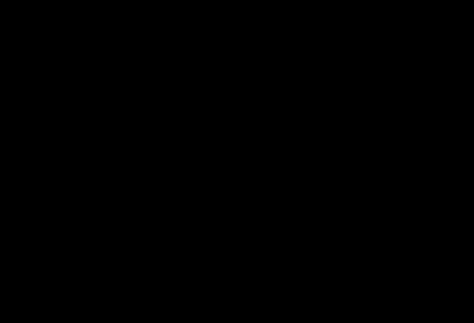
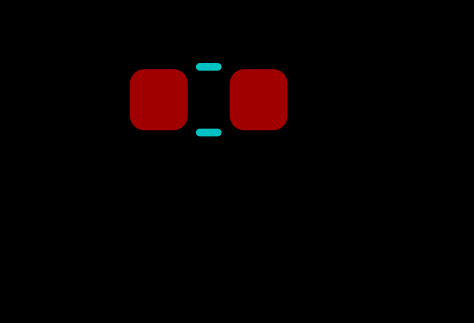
part: none -> (208, 99)

